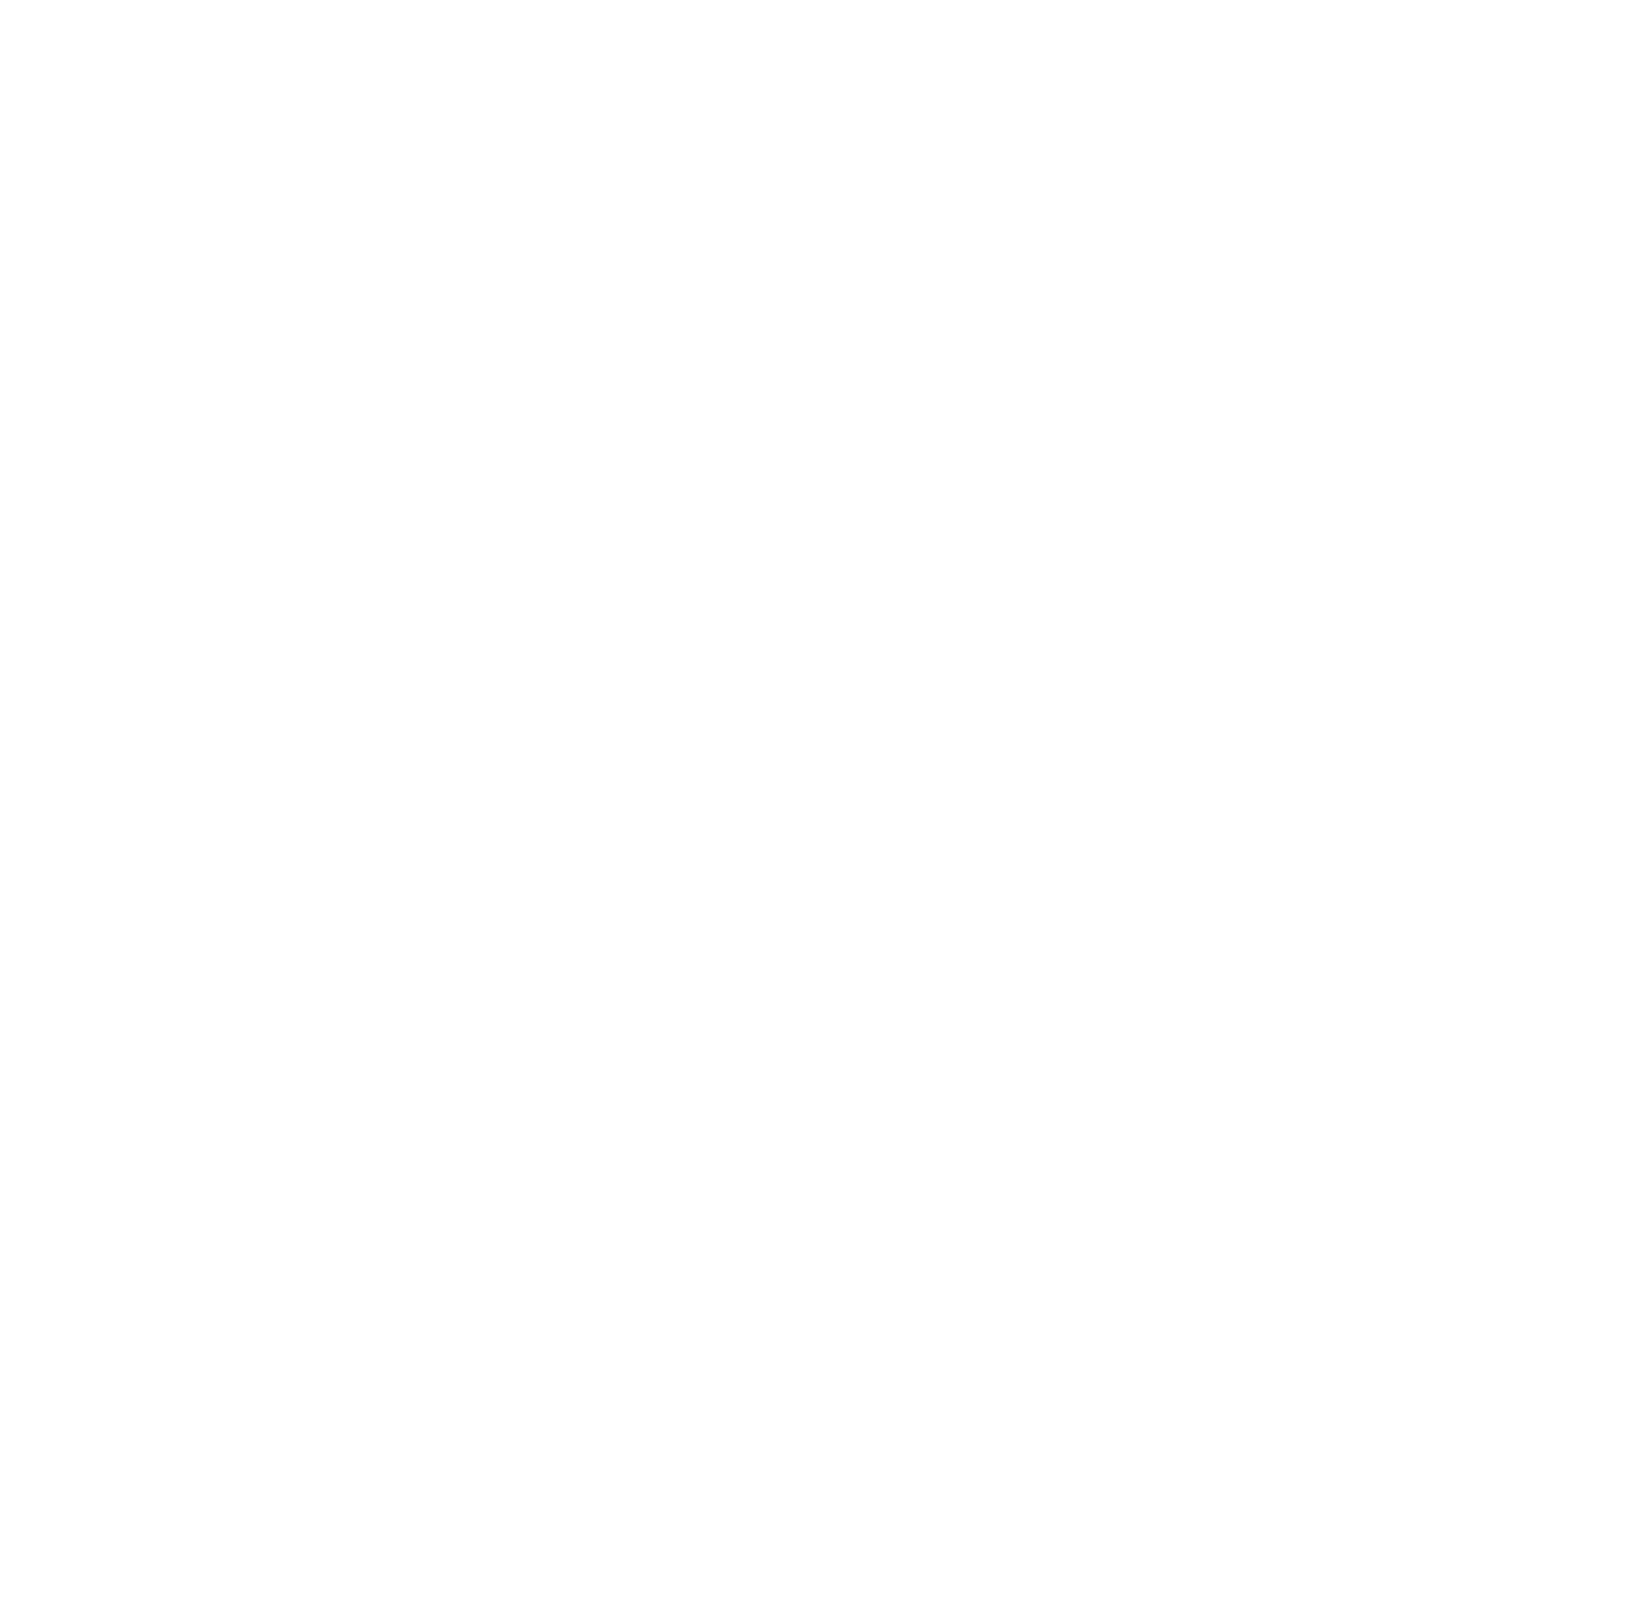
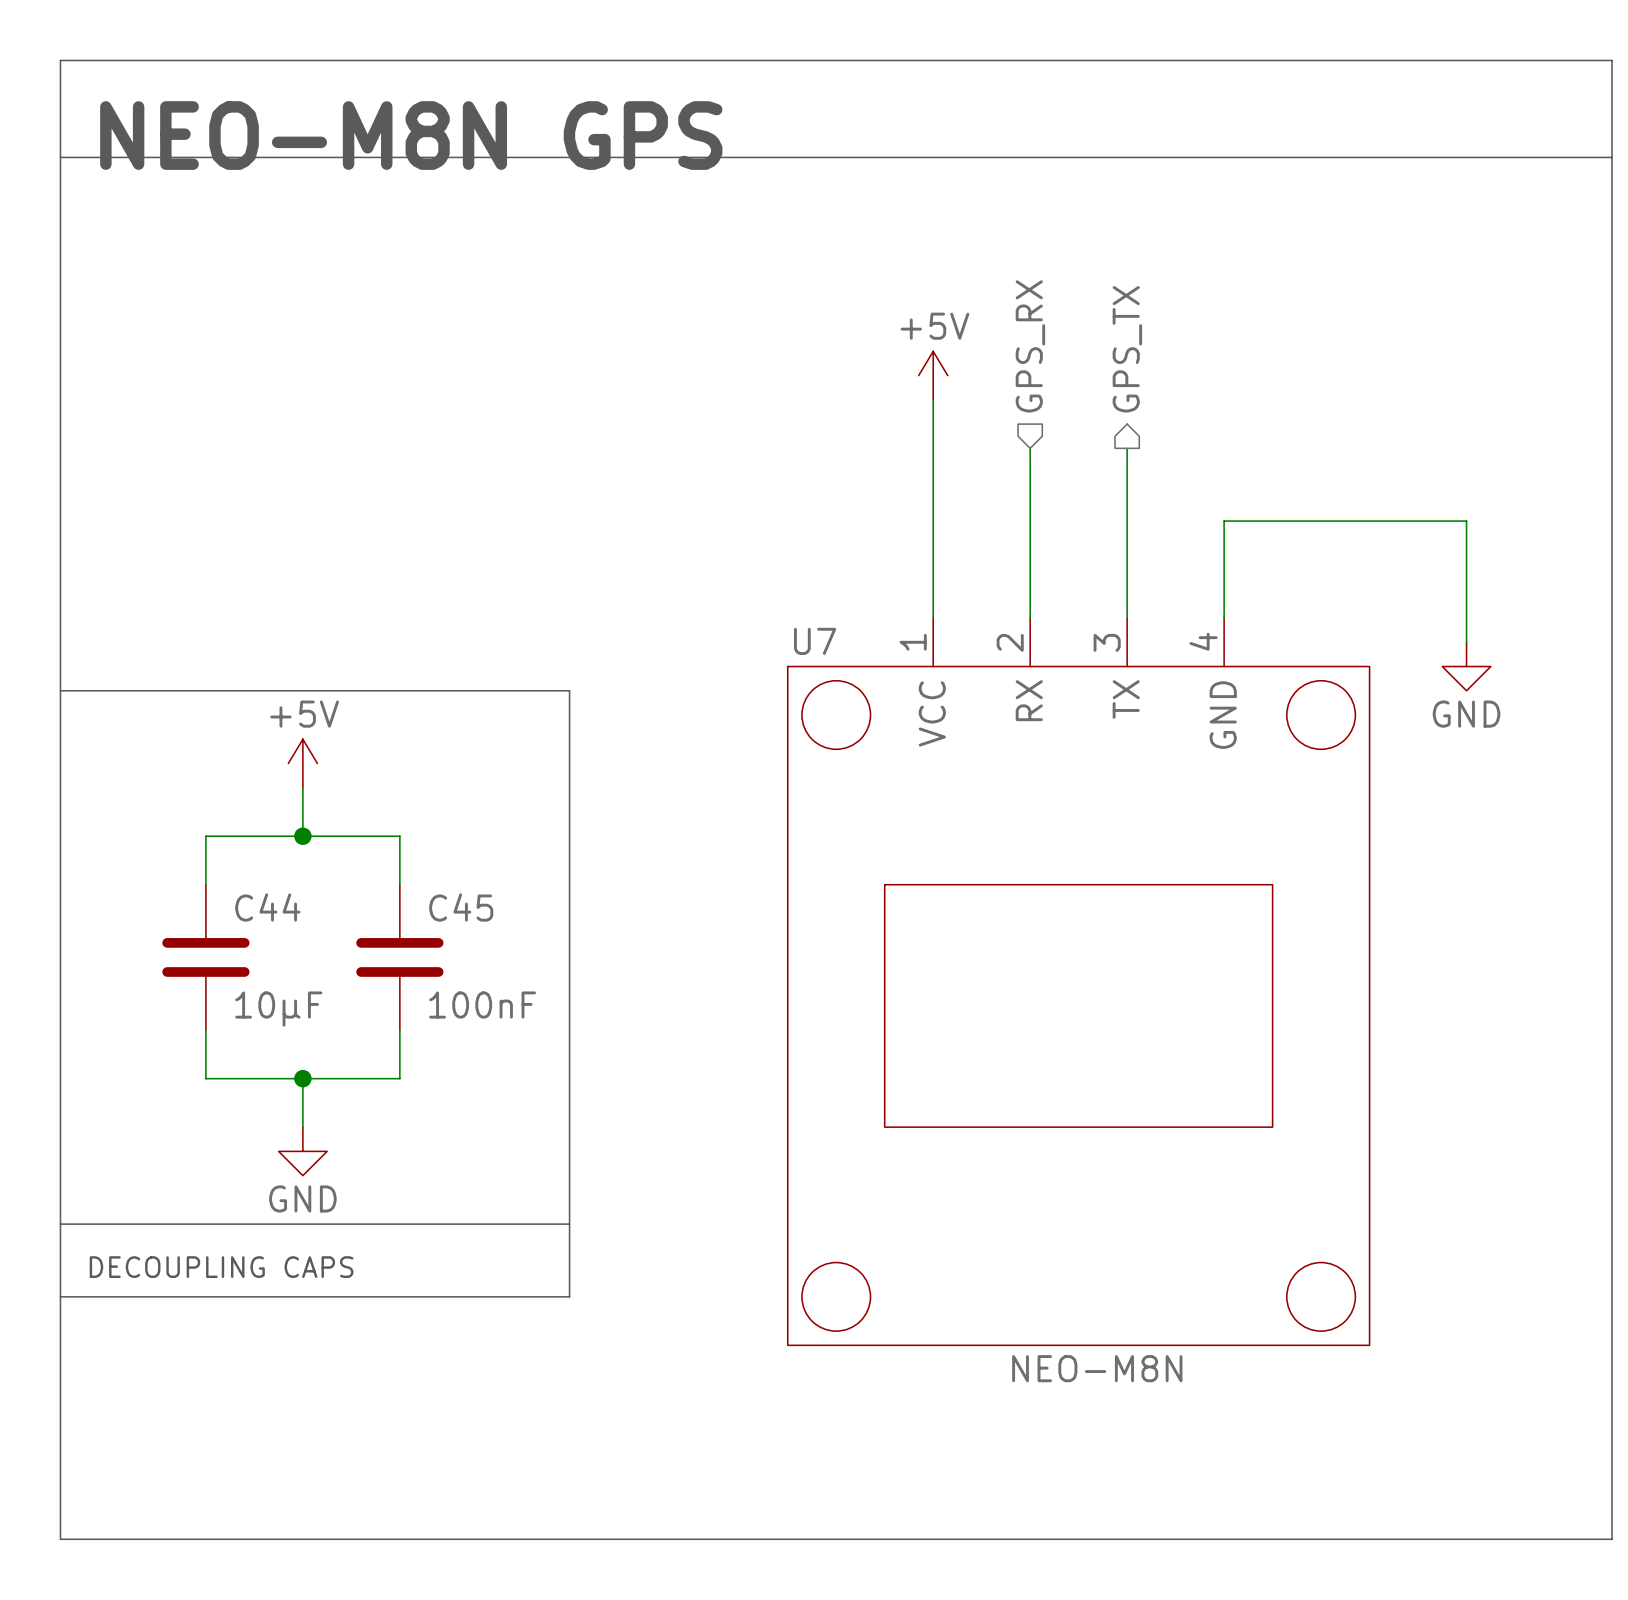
line: none -> (60, 60) (1612, 60) (1612, 1539) (60, 1539) (60, 60)
text: none -> NEO-M8N GPS (411, 135)
line: none -> (60, 157) (1612, 157)
hierarchical label: none -> GPS_RX (1030, 346)
hierarchical label: none -> GPS_TX (1127, 349)
power symbol: none -> +5V (933, 375)
wire: none -> (933, 399) (933, 618)
wire: none -> (1030, 448) (1030, 618)
wire: none -> (1127, 448) (1127, 618)
wire: none -> (1224, 618) (1224, 521) (1466, 521) (1466, 642)
power symbol: none -> GND (1466, 666)
line: none -> (60, 690) (569, 690) (569, 1296) (60, 1296)
power symbol: none -> +5V (302, 763)
wire: none -> (302, 787) (302, 836)
junction: none -> (302, 836)
wire: none -> (205, 884) (205, 836) (399, 836) (399, 884)
C44: none -> 10μF (205, 957)
C45: none -> 100nF (399, 957)
U7: none -> NEO-M8N (1078, 981)
wire: none -> (205, 1030) (205, 1078) (399, 1078) (399, 1030)
wire: none -> (302, 1078) (302, 1127)
junction: none -> (302, 1078)
power symbol: none -> GND (302, 1151)
line: none -> (60, 1224) (569, 1224)
text: none -> DECOUPLING CAPS (221, 1267)

